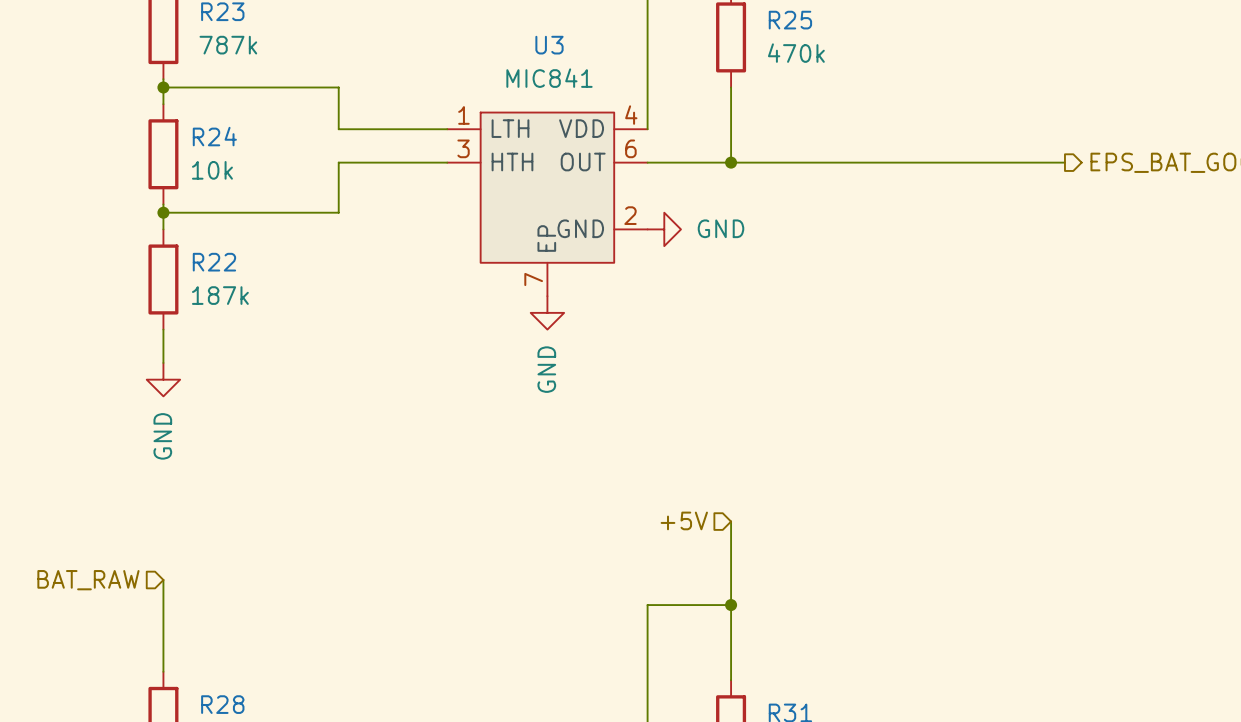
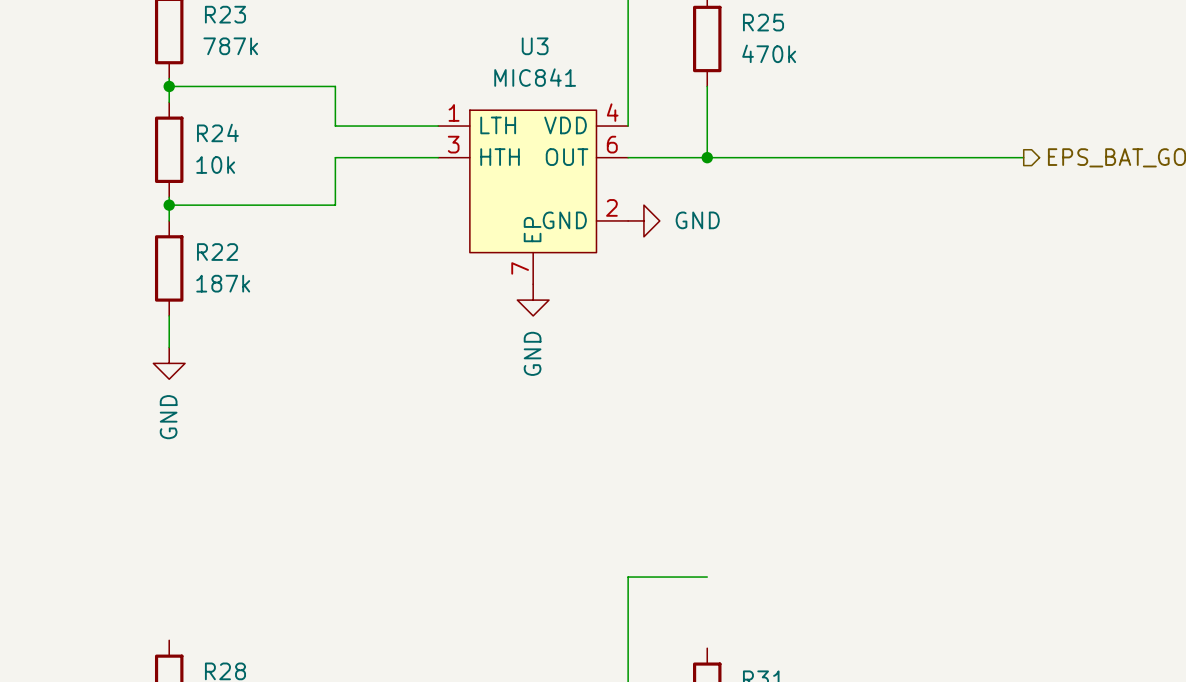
hierarchical label: +5V (684, 520) -> none
wire: (731, 521) (731, 680) -> none
hierarchical label: BAT_RAW (88, 580) -> none
wire: (163, 580) (163, 671) -> none
junction: (731, 605) -> none

